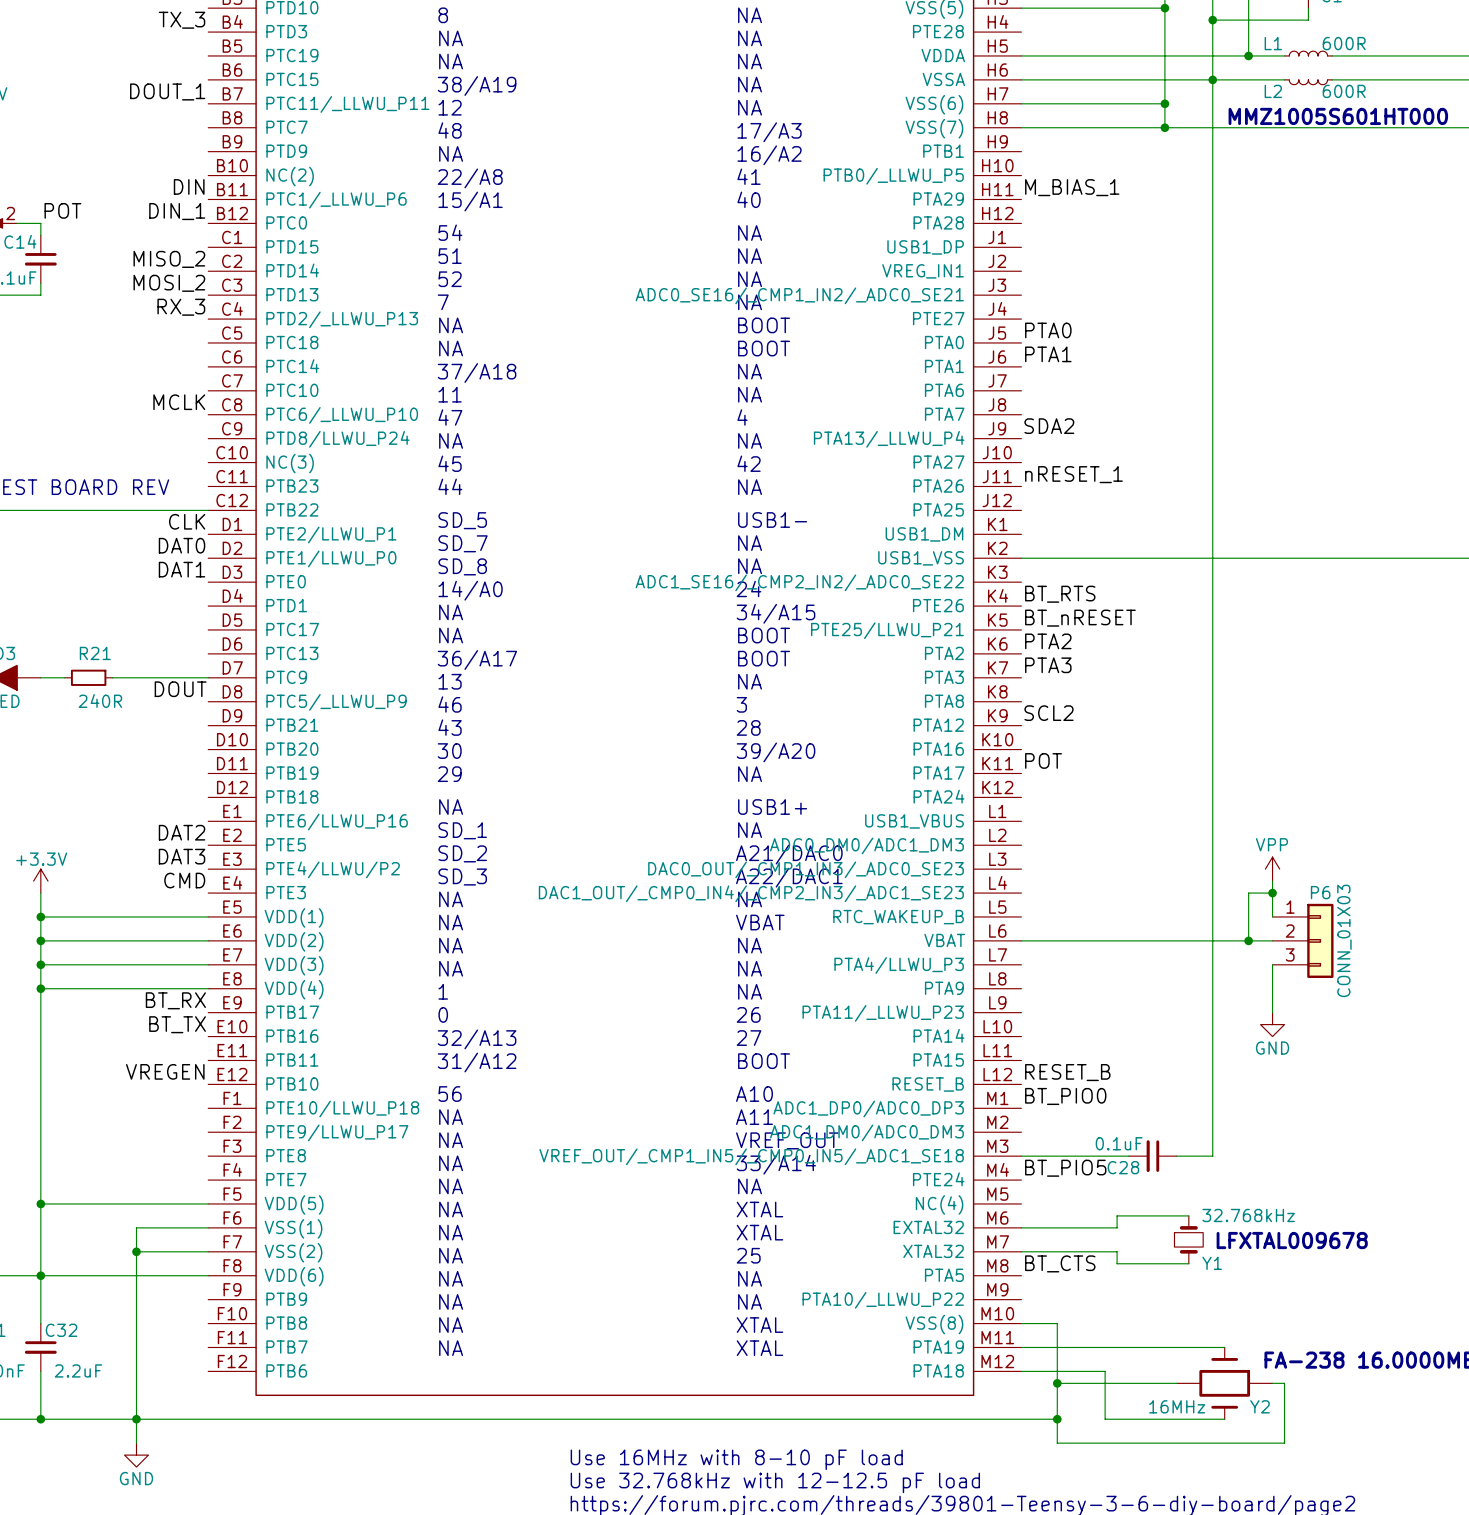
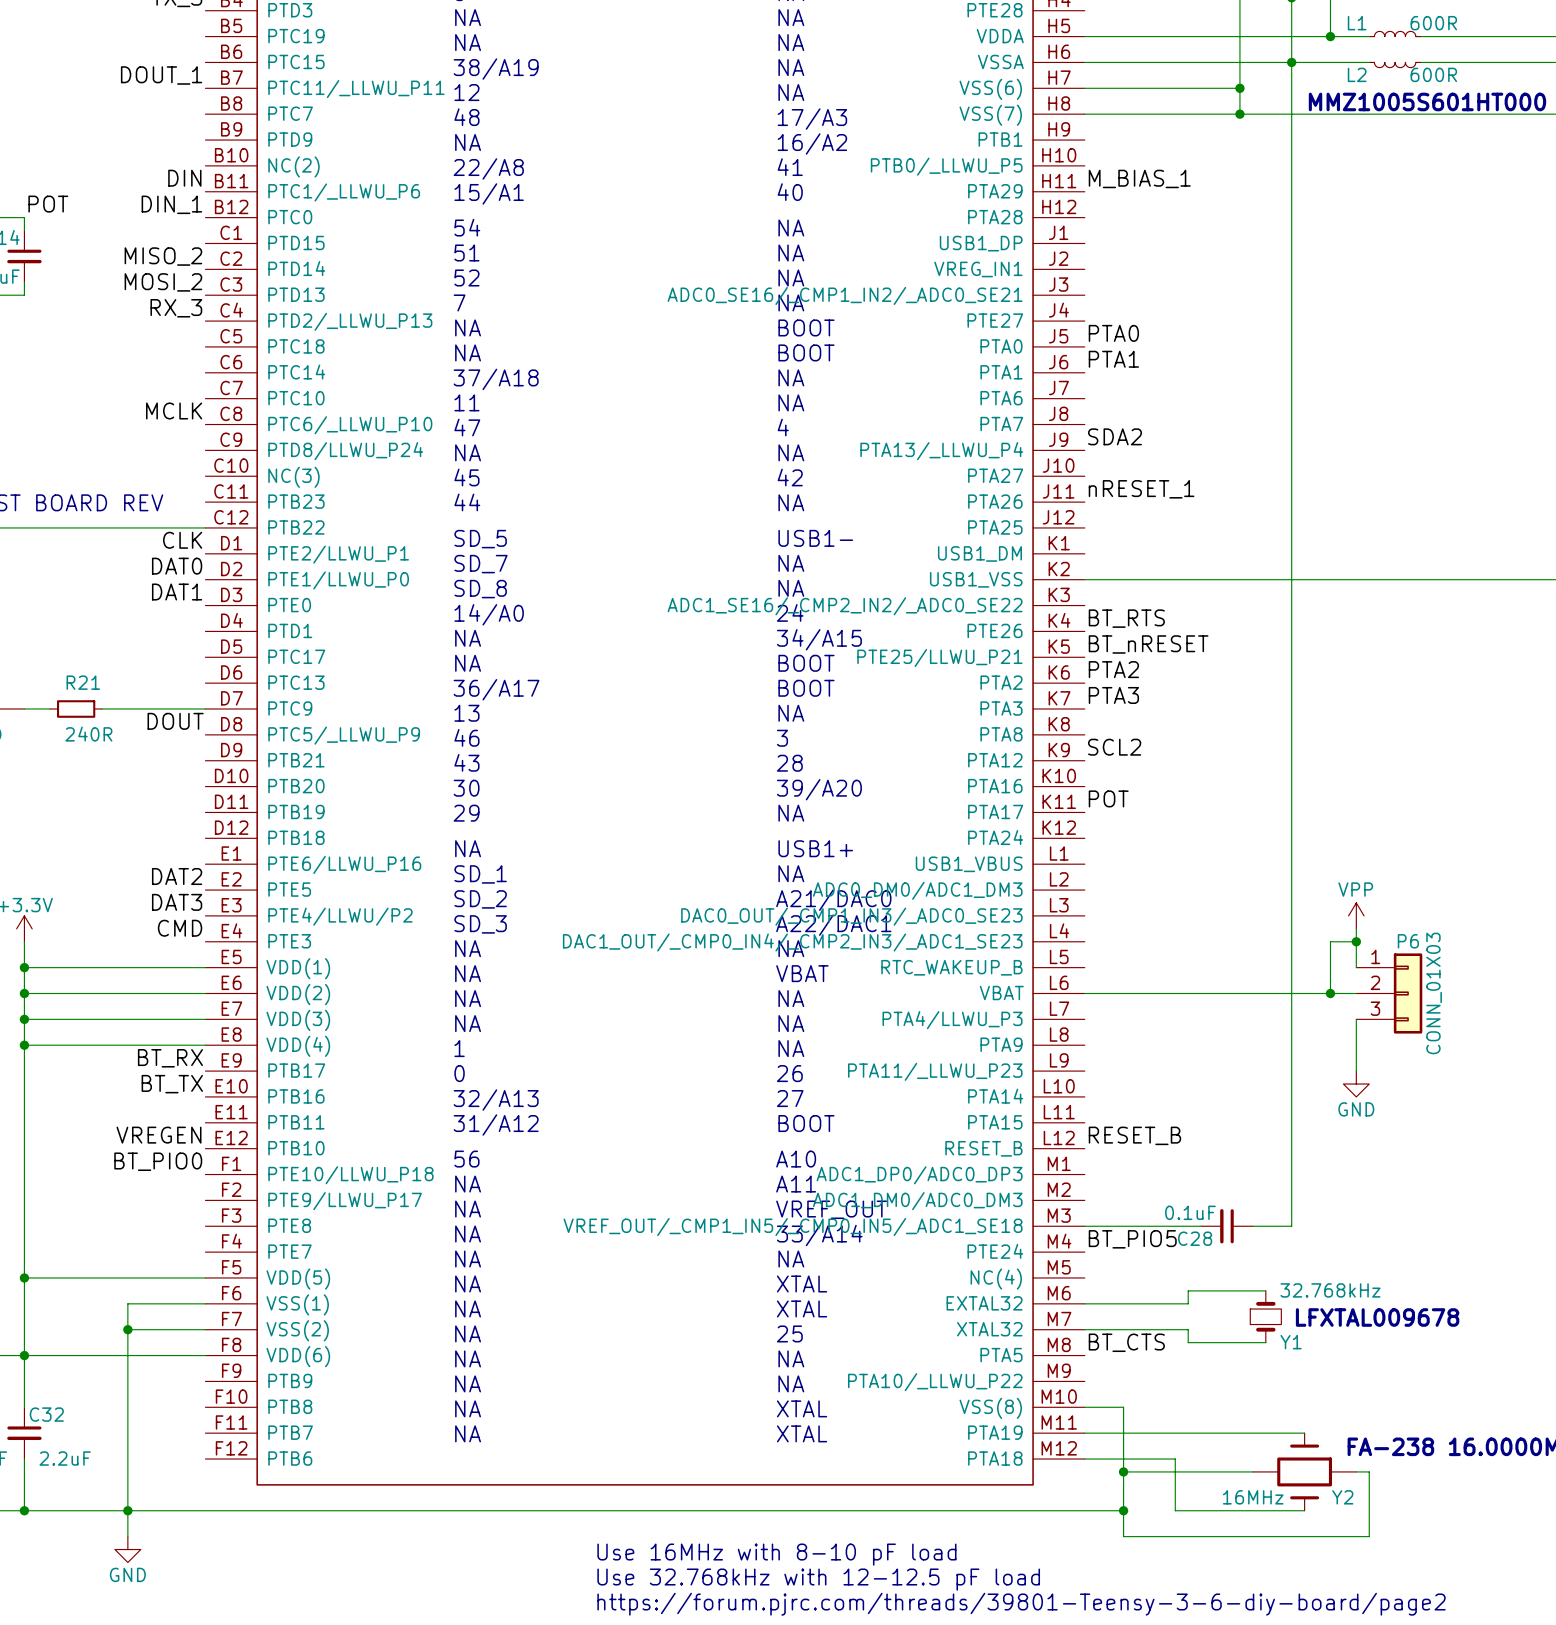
label: none -> BT_PIO0 (158, 1161)
label: BT_PIO0 (1065, 1096) -> none

